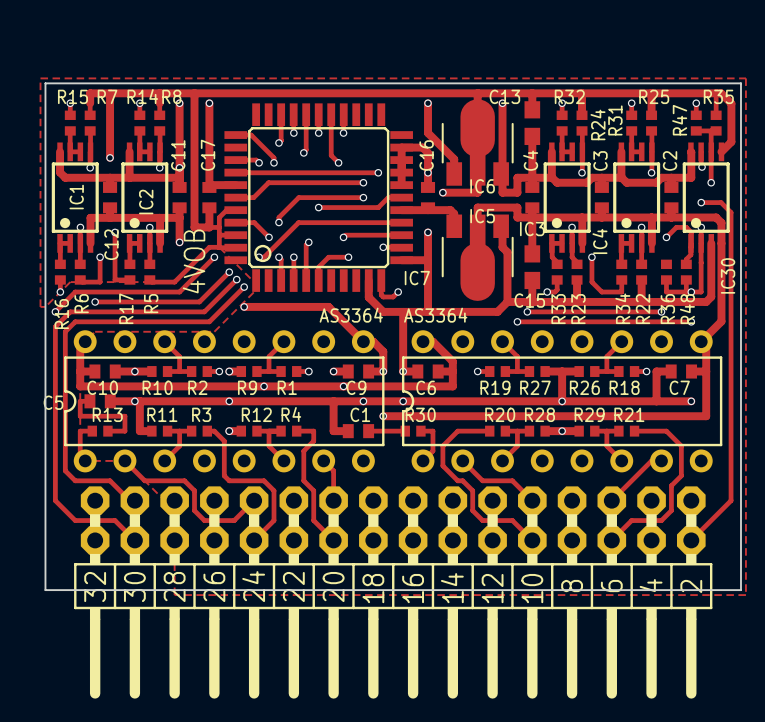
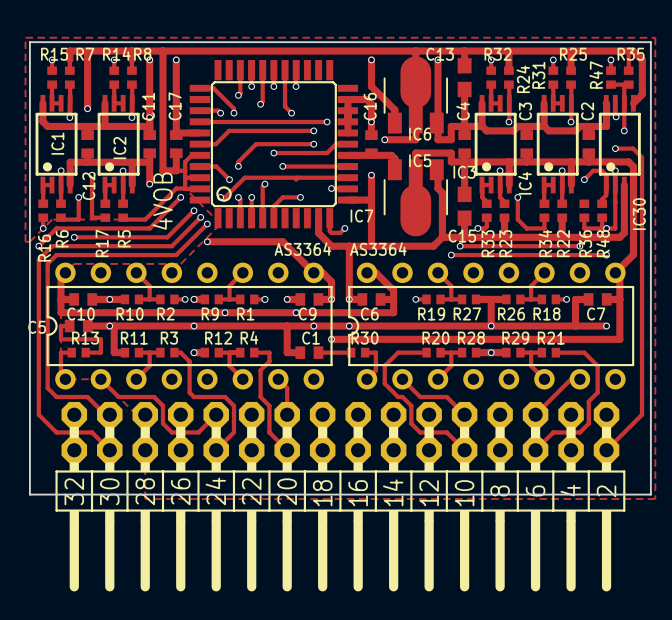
track: (328, 222) (298, 222) (286, 235) -> (298, 177) (244, 177)
via position: (343, 237) -> (282, 166)

